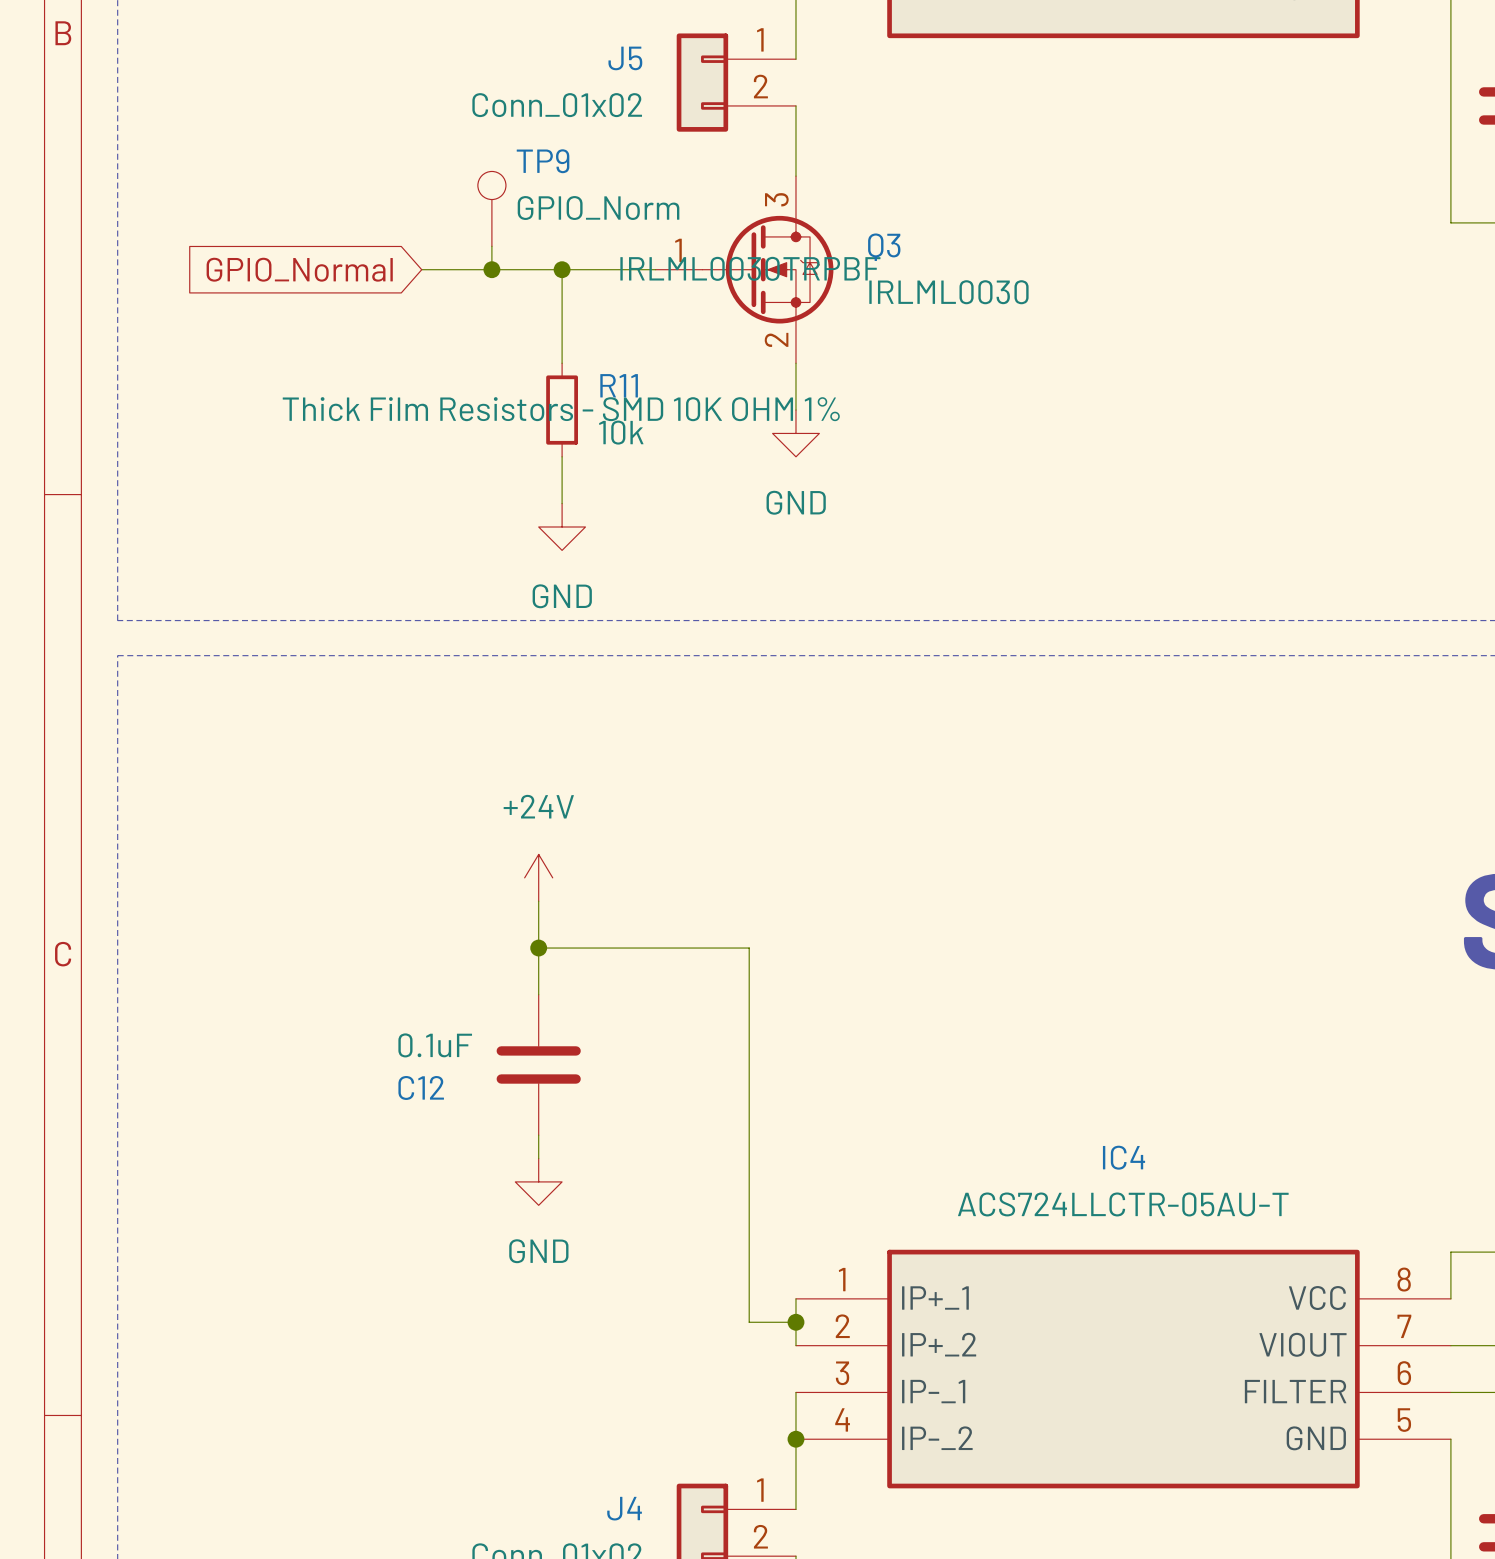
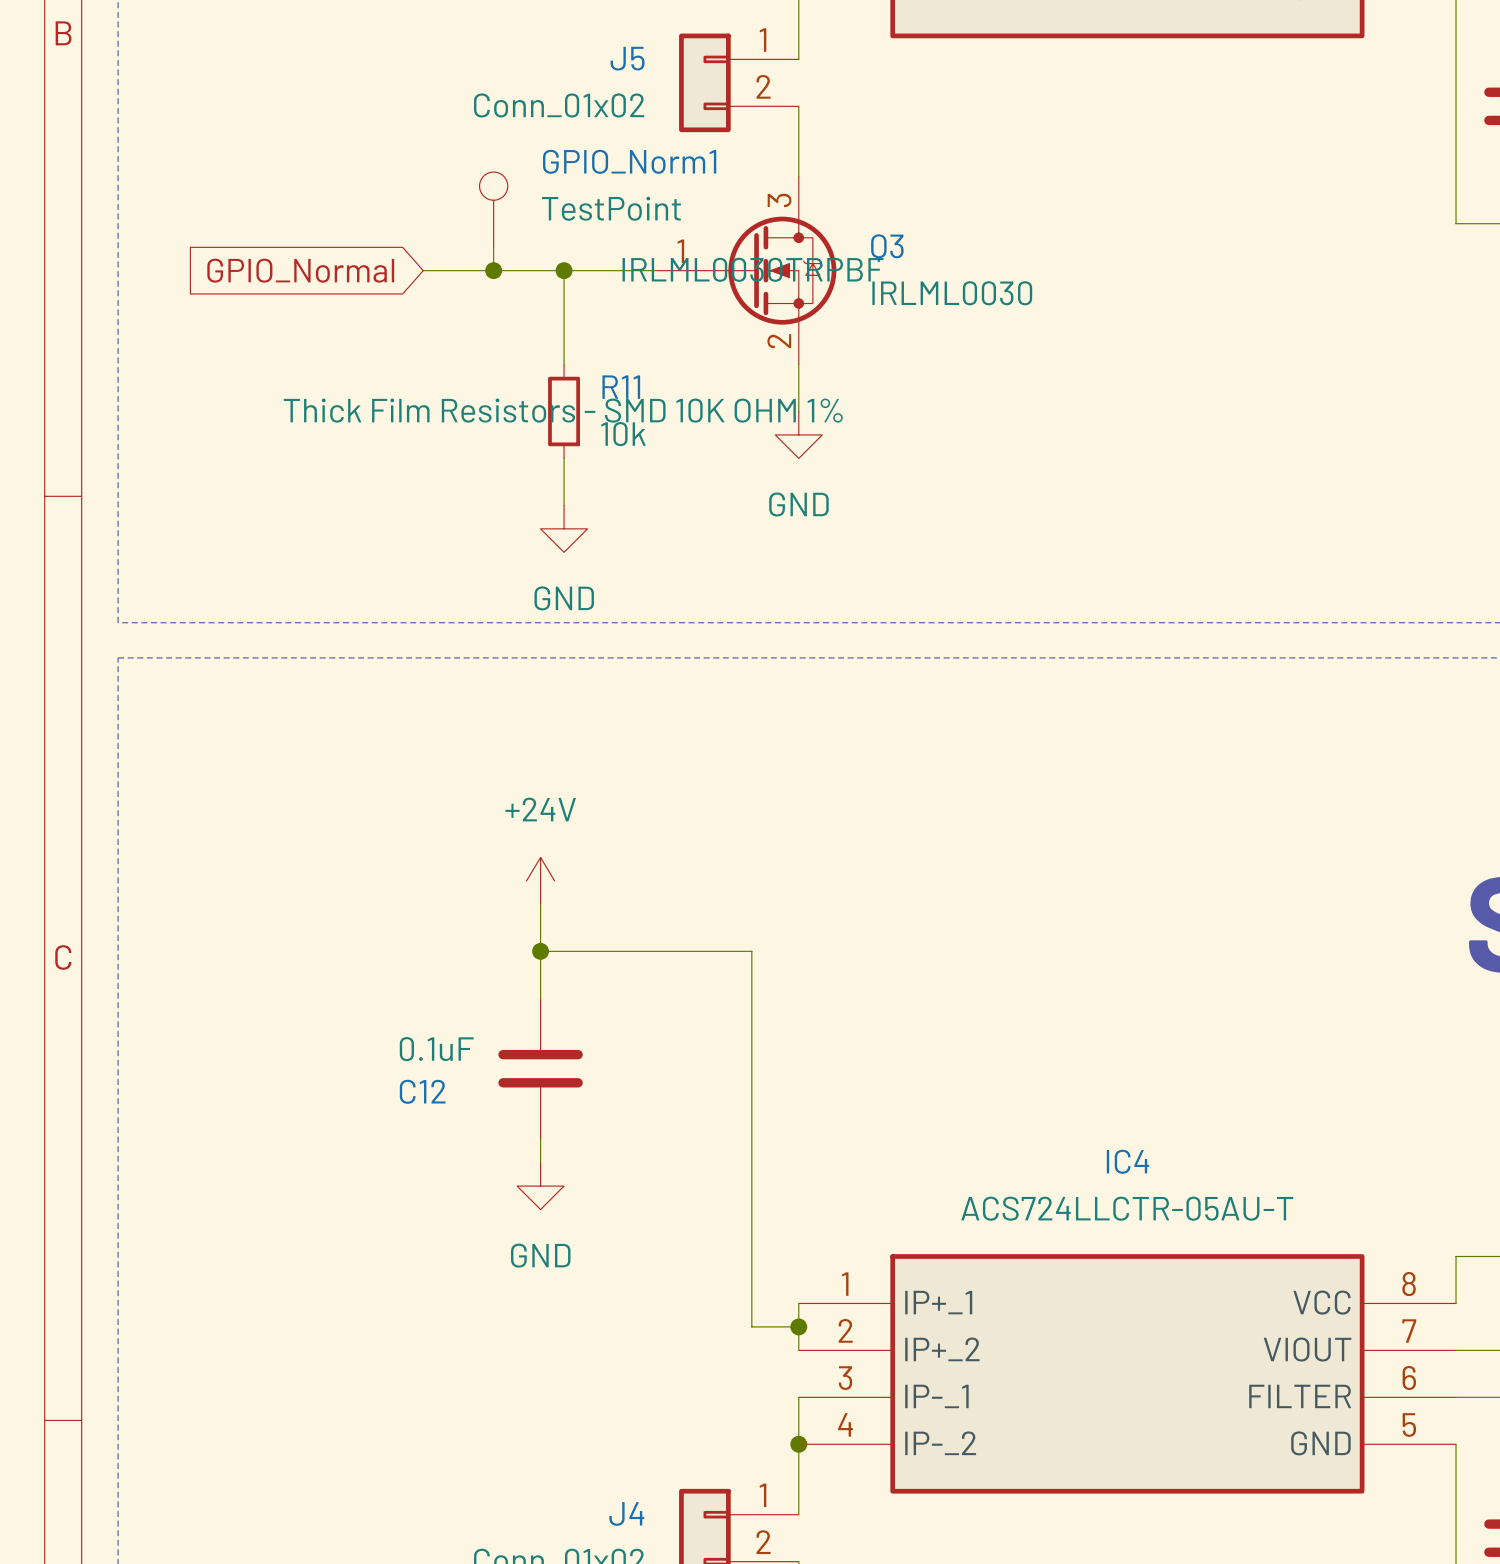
TP9 name: TP9 (543, 161) -> GPIO_Norm1 (629, 161)
TP9 value: GPIO_Norm (598, 208) -> TestPoint (611, 208)

